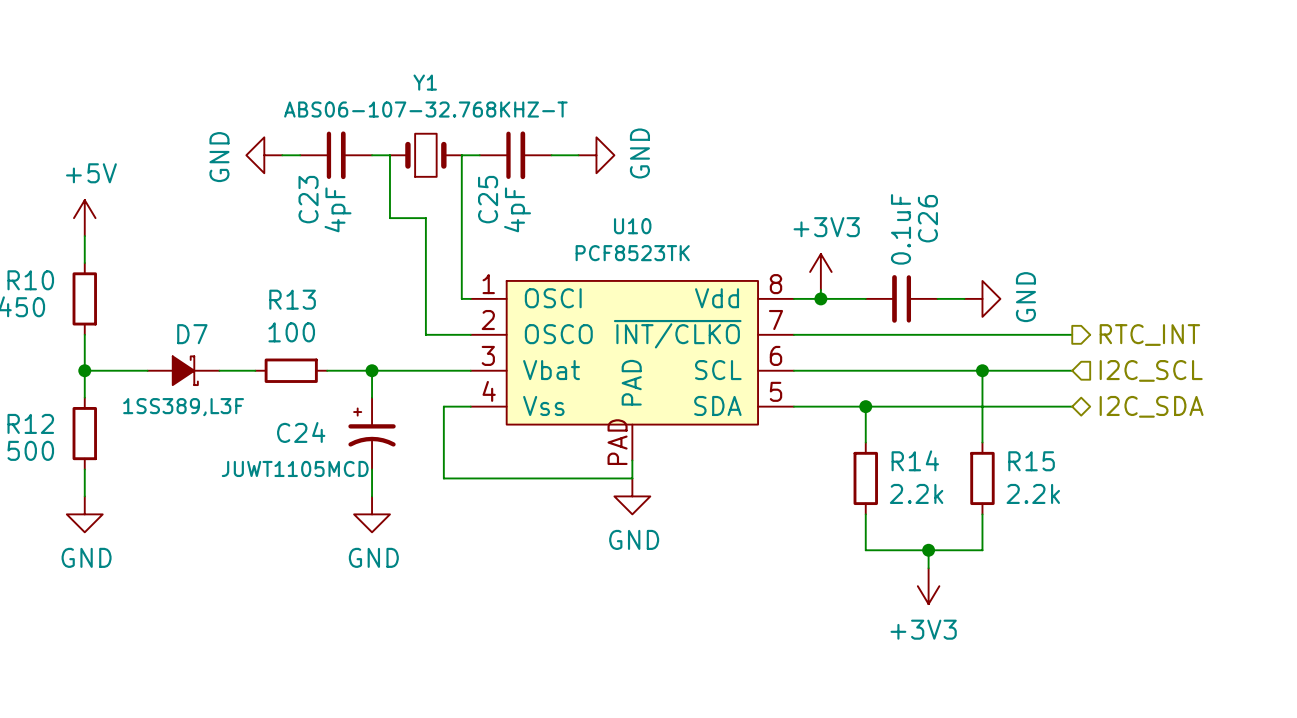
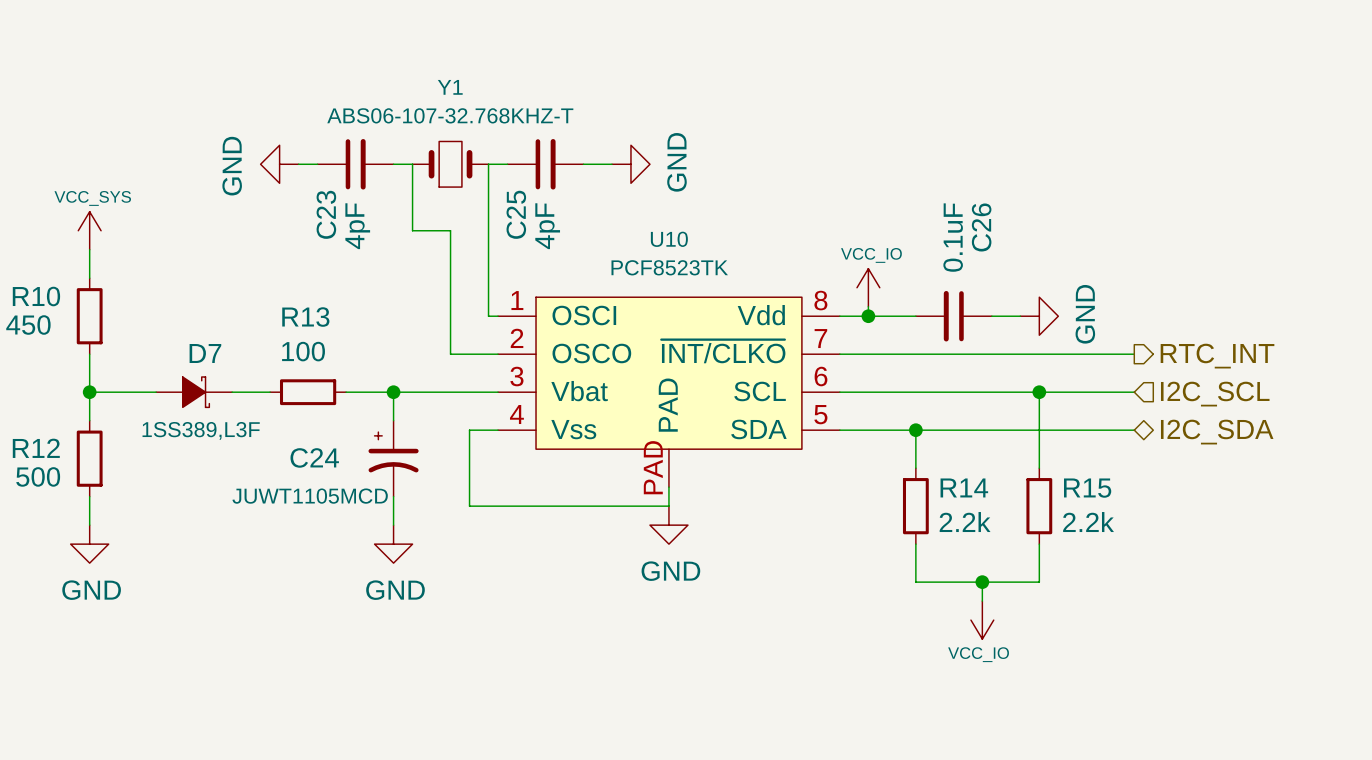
power symbol: +5V (84, 218) -> VCC_SYS (89, 230)
power symbol: +3V3 (820, 271) -> VCC_IO (868, 287)
power symbol: +3V3 (928, 586) -> VCC_IO (982, 620)

